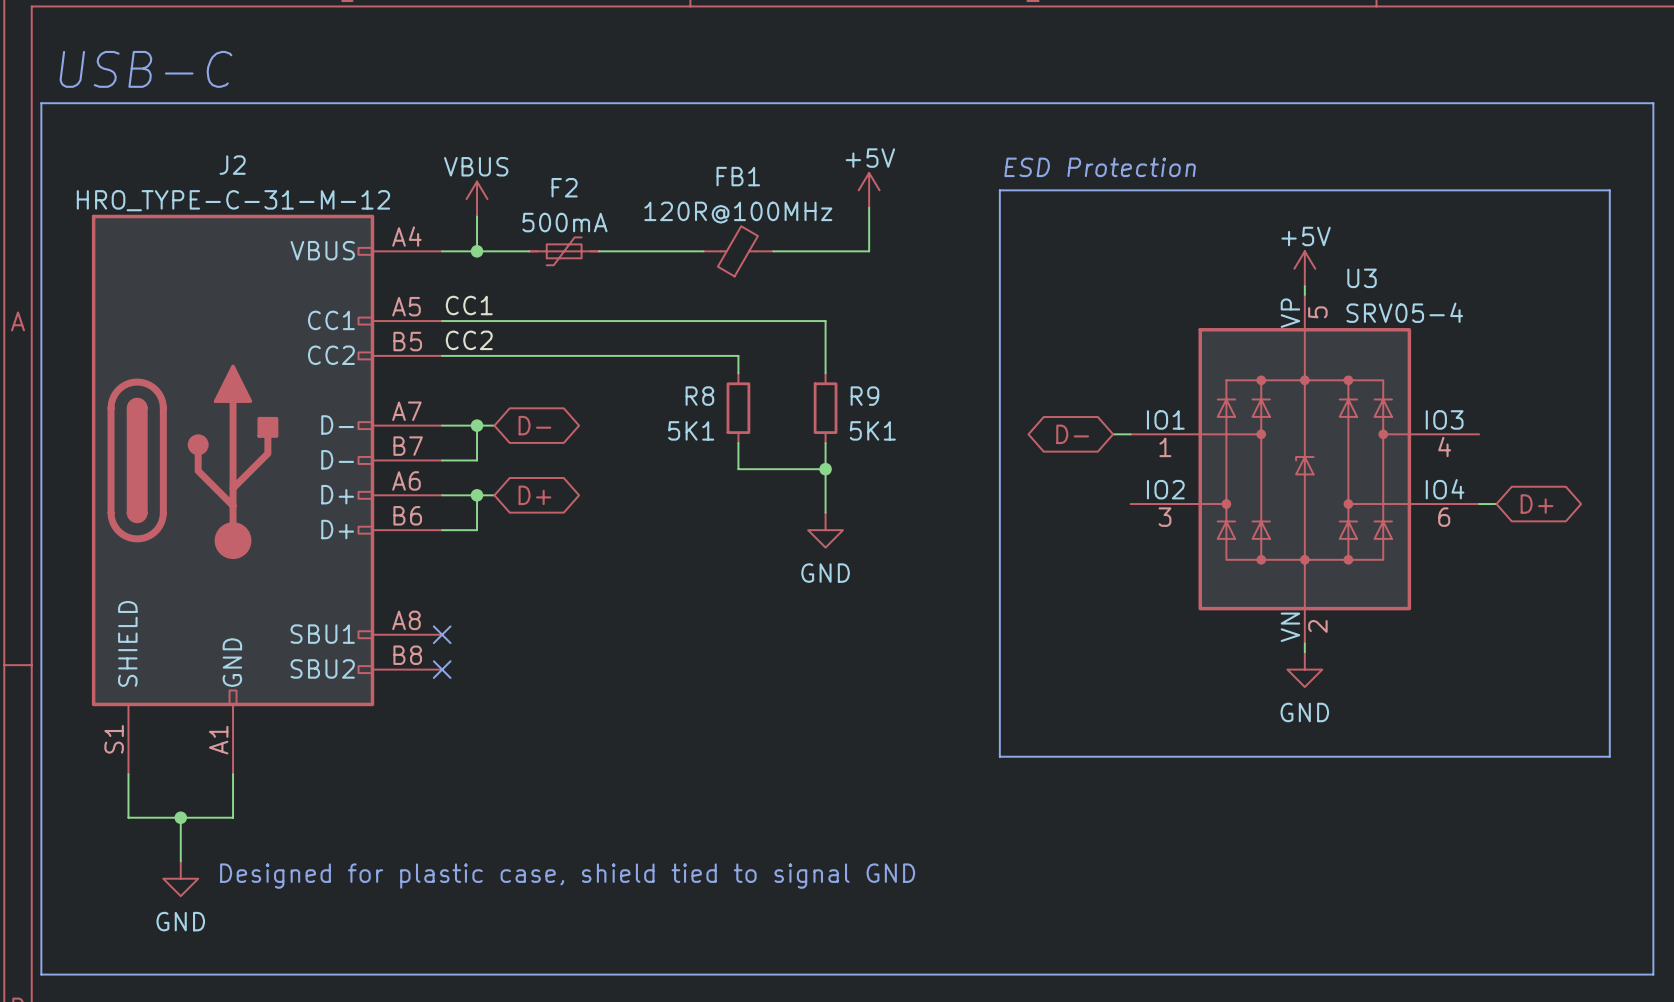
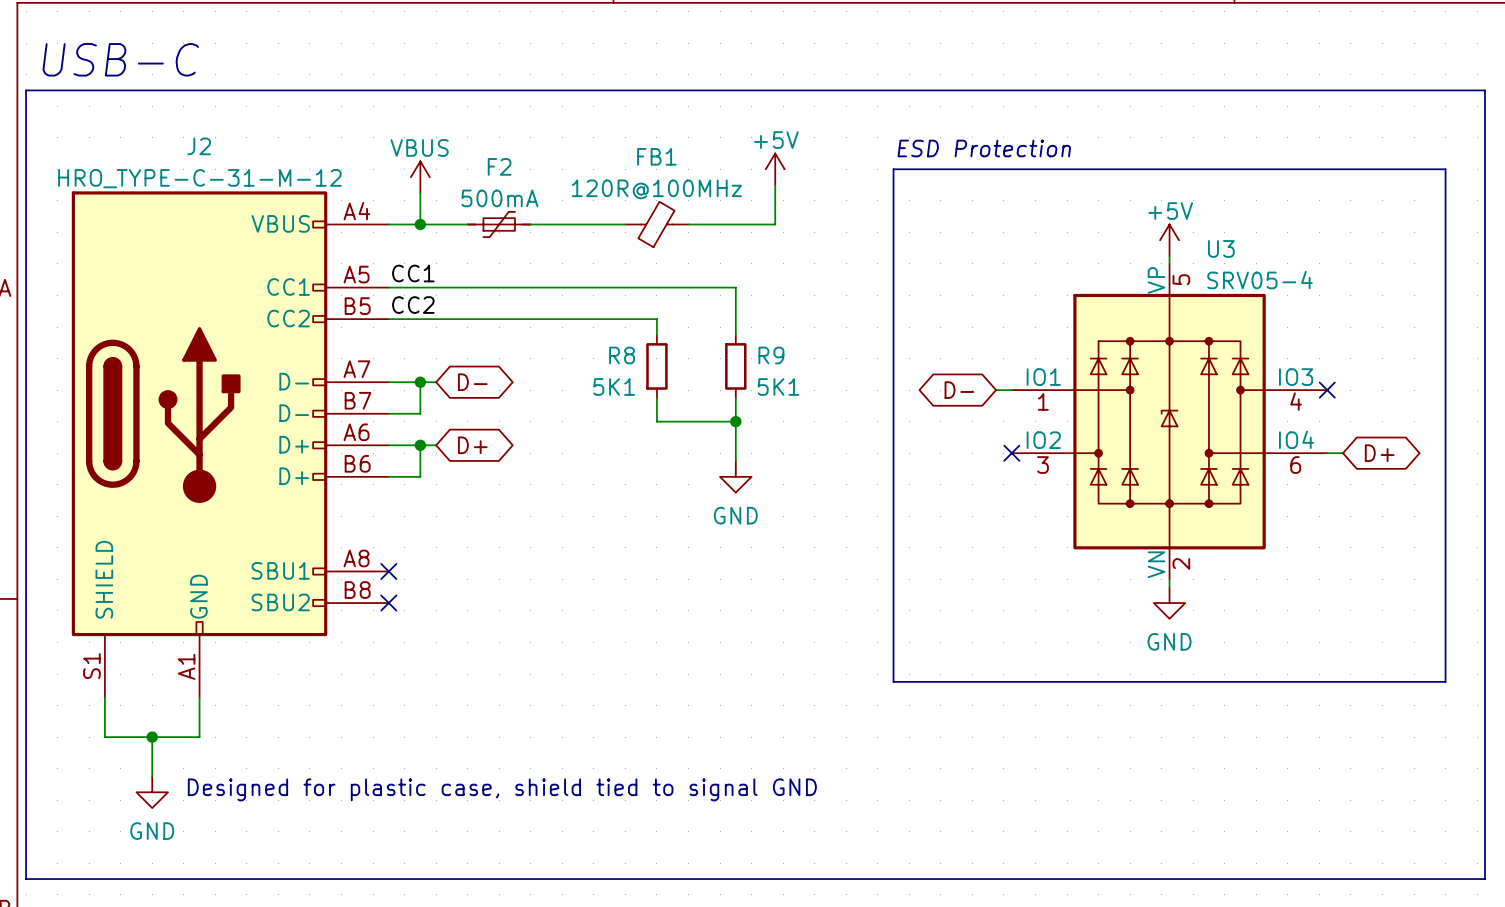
no-connect mark: none -> (1327, 390)
no-connect mark: none -> (1011, 453)

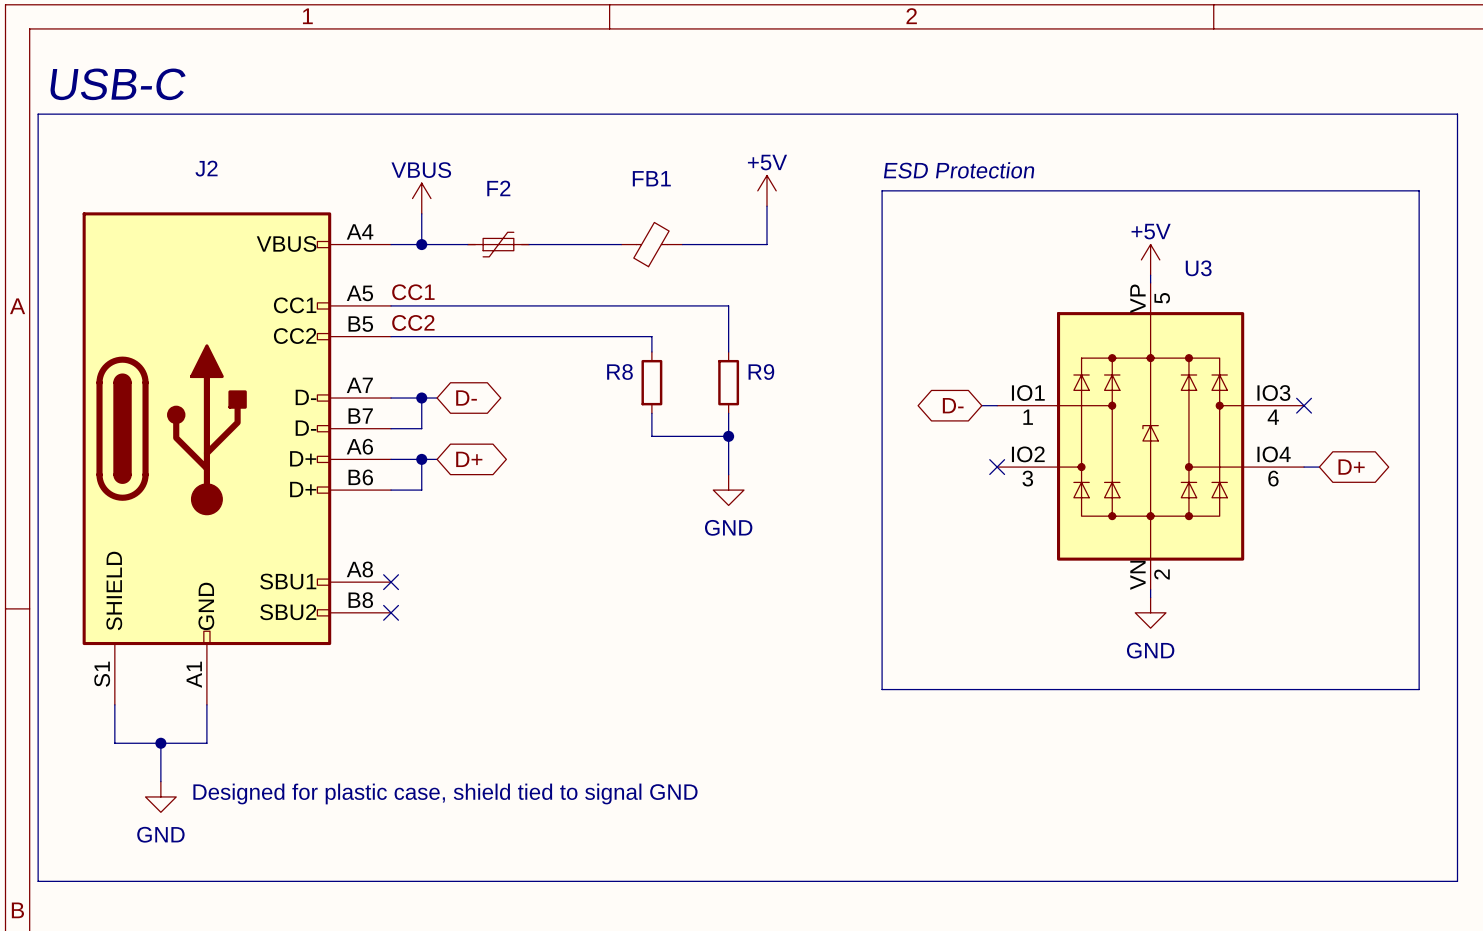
J2 value: HRO_TYPE-C-31-M-12 (199, 178) -> none
FB1 value: 120R@100MHz (656, 189) -> none
F2 value: 500mA (499, 198) -> none
U3 value: SRV05-4 (1260, 280) -> none
R8 value: 5K1 (614, 386) -> none
R9 value: 5K1 (778, 386) -> none

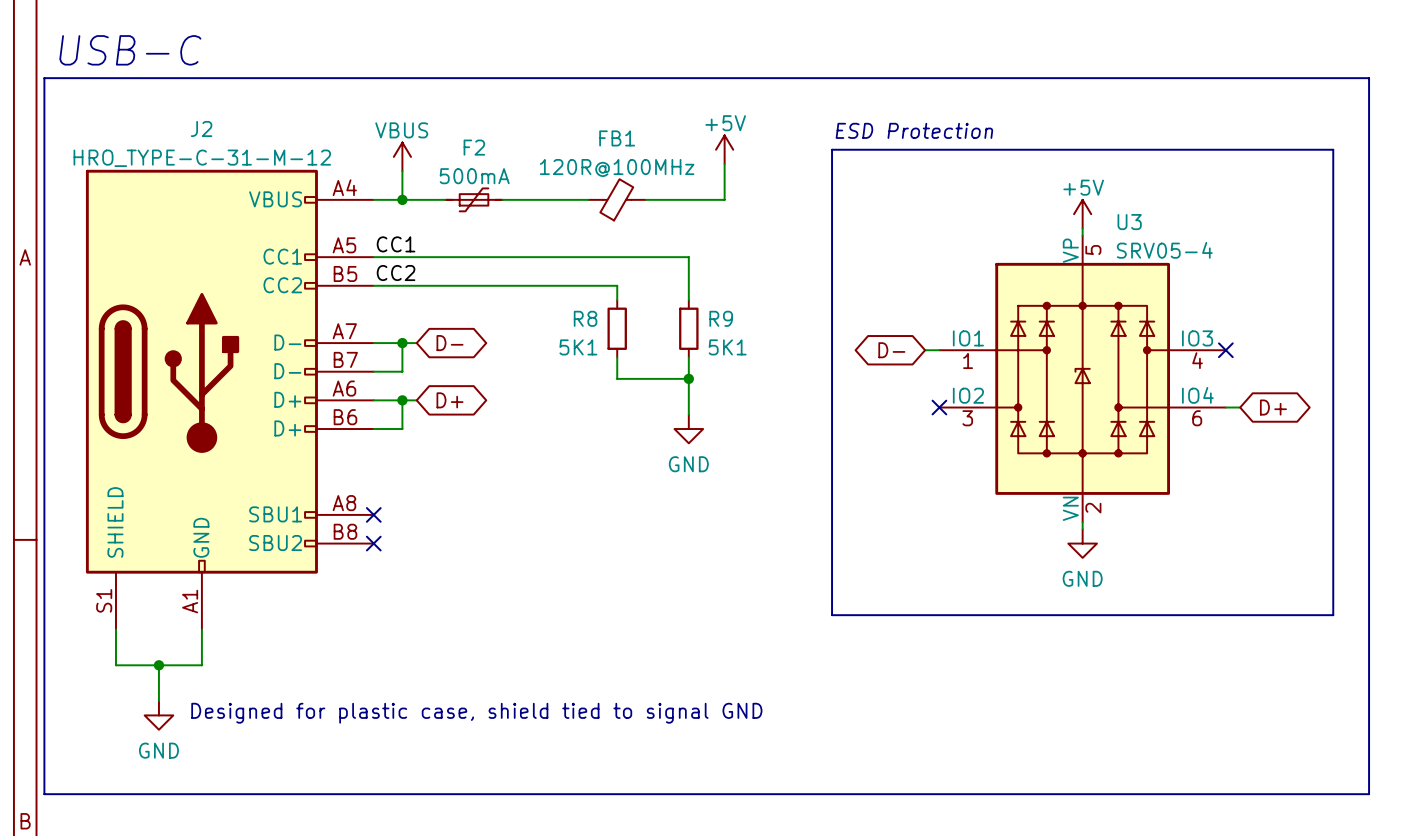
J2 value: none -> HRO_TYPE-C-31-M-12 (202, 158)
FB1 value: none -> 120R@100MHz (617, 168)
F2 value: none -> 500mA (474, 176)
U3 value: none -> SRV05-4 (1164, 250)
R8 value: none -> 5K1 (578, 347)
R9 value: none -> 5K1 (727, 347)

